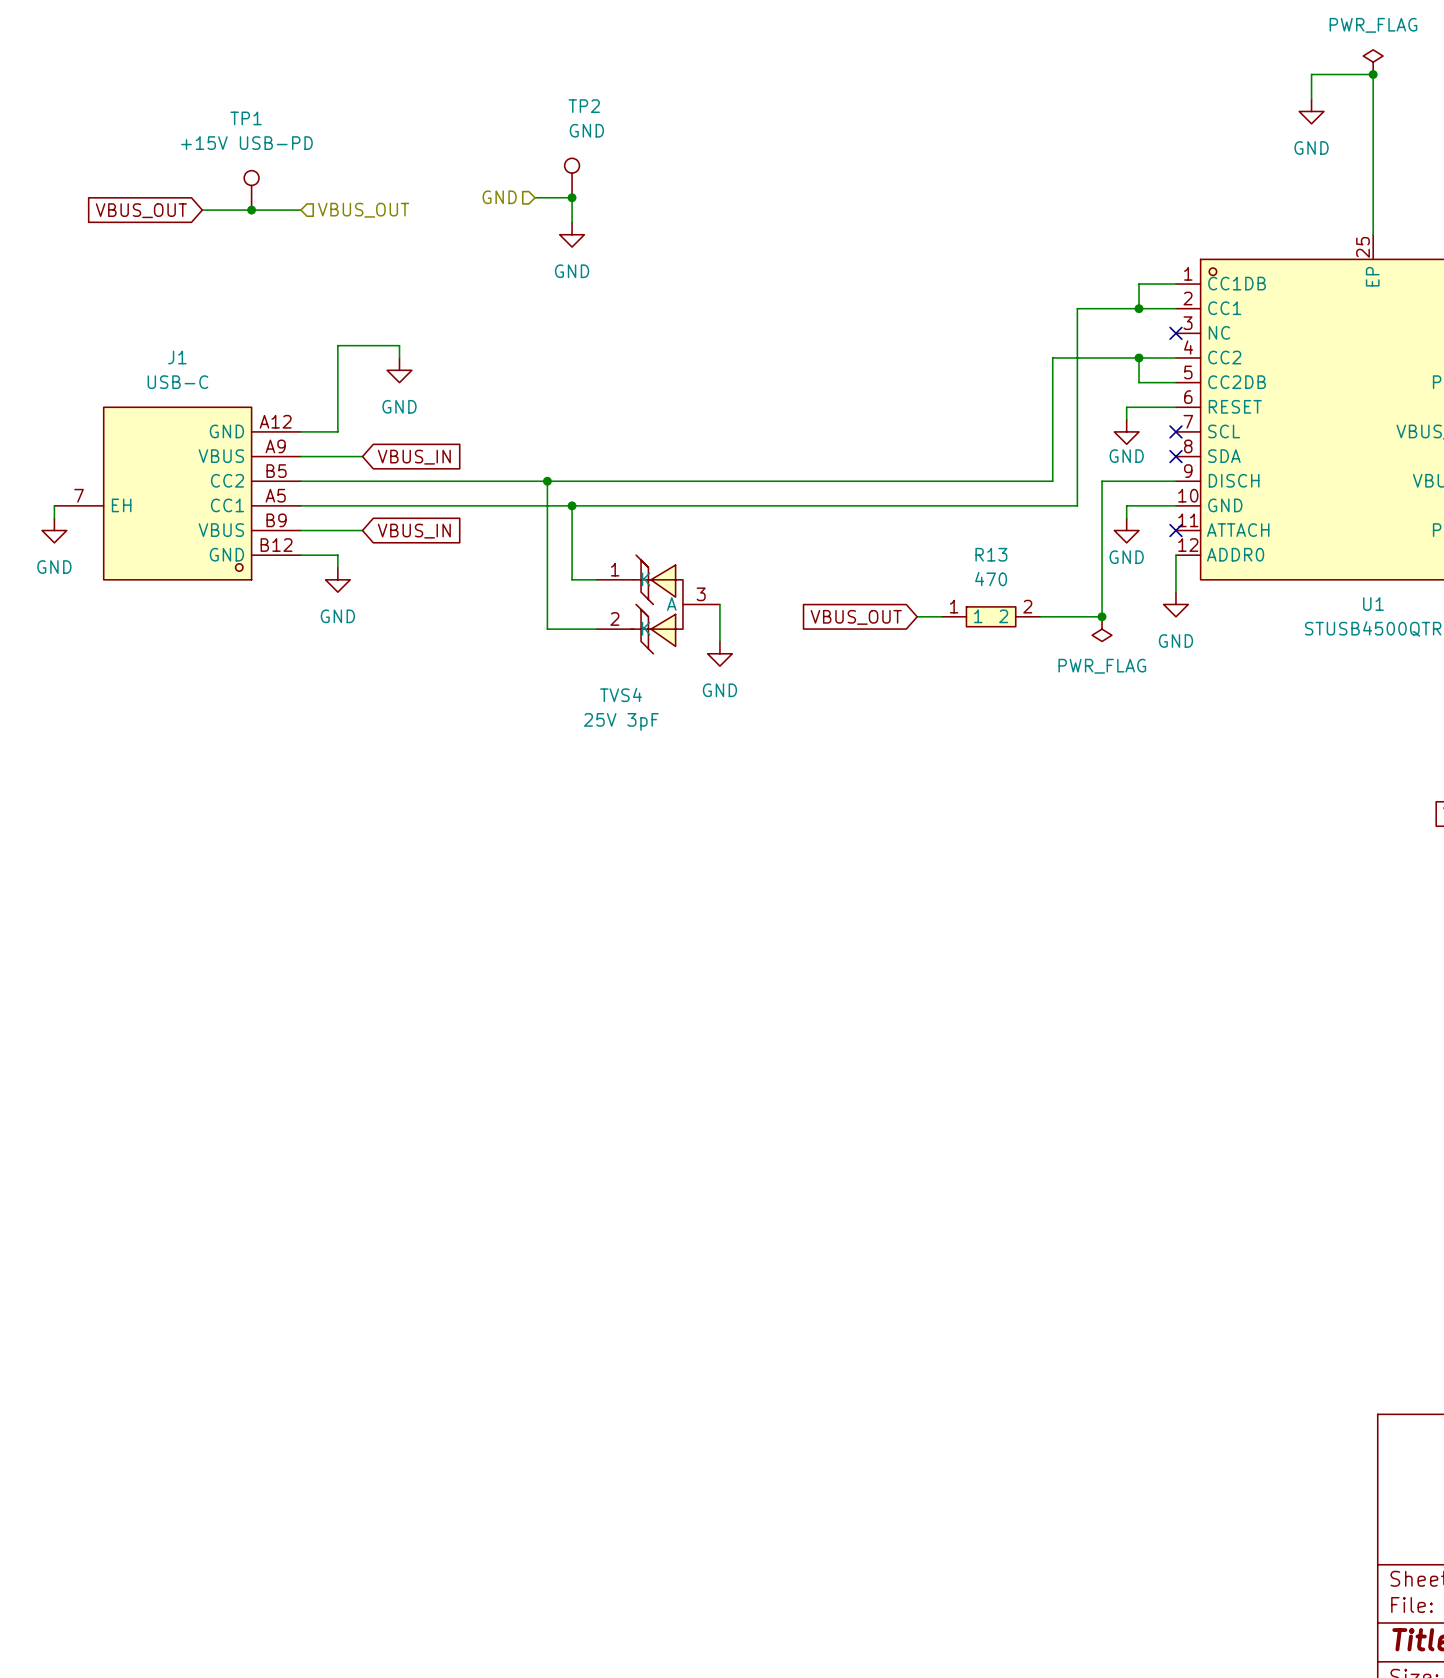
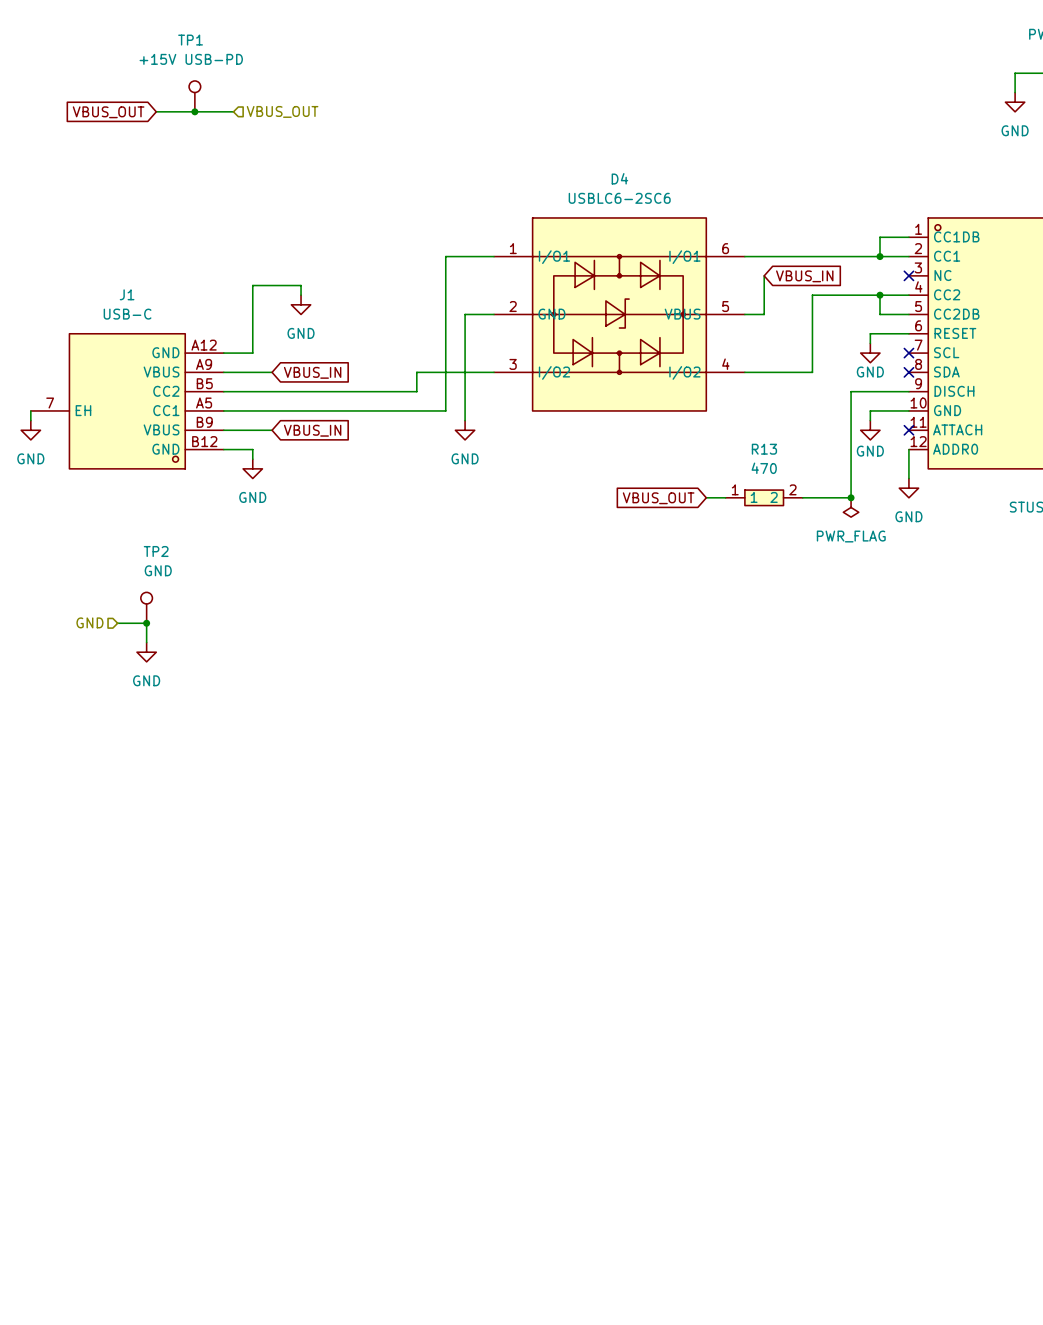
junction: none -> (194, 111)
TP2 position: (572, 178) -> (146, 607)
TP1 position: (251, 190) -> (194, 96)
hierarchical label: GND (499, 197) -> none
wire: (535, 197) (572, 197) (572, 222) -> none
junction: (572, 197) -> none
global label position: VBUS_OUT (141, 210) -> VBUS_OUT (108, 112)
wire: (202, 210) (300, 210) -> (156, 111) (233, 111)
junction: (251, 210) -> none
hierarchical label position: VBUS_OUT (363, 210) -> VBUS_OUT (282, 111)
power symbol: GND (572, 234) -> none
wire: none -> (494, 256) (445, 256) (445, 410)
wire: (1077, 308) (1077, 505) (584, 505) -> (831, 256) (744, 256)
wire: none -> (764, 275) (764, 314) (744, 314)
global label: none -> VBUS_IN (804, 276)
wire: none -> (494, 314) (465, 314) (465, 420)
D4: none -> USBLC6-2SC6 (619, 314)
wire: none -> (494, 372) (416, 372) (416, 391)
wire: (1052, 456) (1052, 481) (547, 481) (547, 629) (596, 629) -> (812, 372) (744, 372)
junction: (547, 481) -> none
wire: (572, 505) (572, 579) (596, 579) -> none
junction: (572, 505) -> none
power symbol: none -> GND (465, 430)
TVS4: 25V 3pF (658, 604) -> none
wire: (719, 604) (719, 641) -> none
power symbol: GND (719, 653) -> none
hierarchical label: none -> GND (89, 622)
wire: none -> (117, 623) (146, 623) (146, 642)
junction: none -> (146, 623)
power symbol: none -> GND (146, 652)

